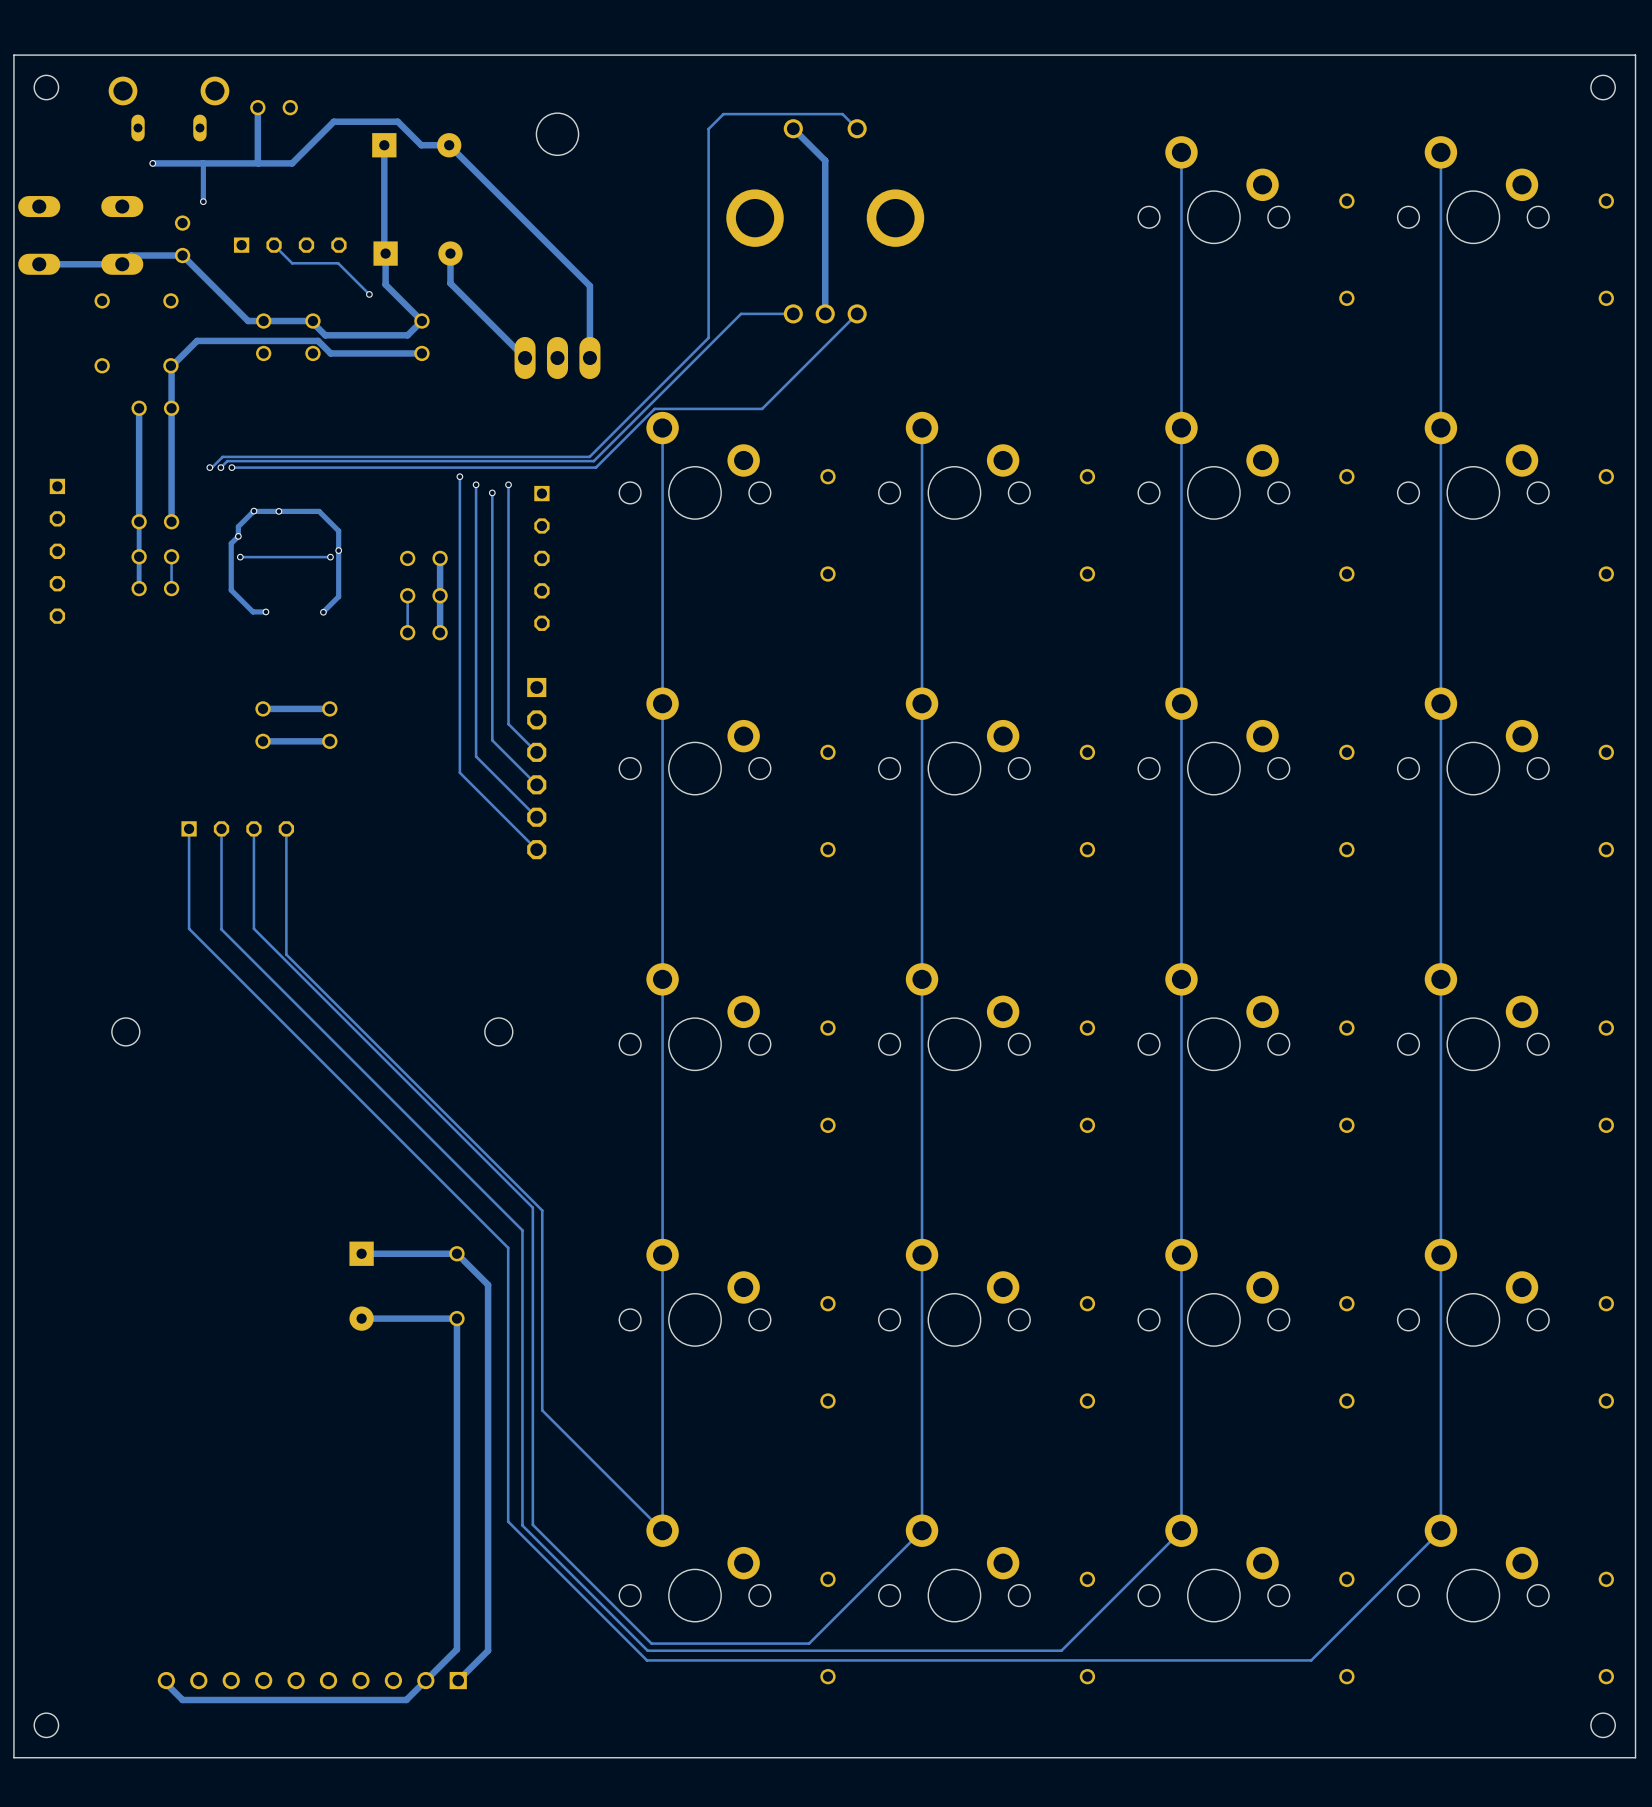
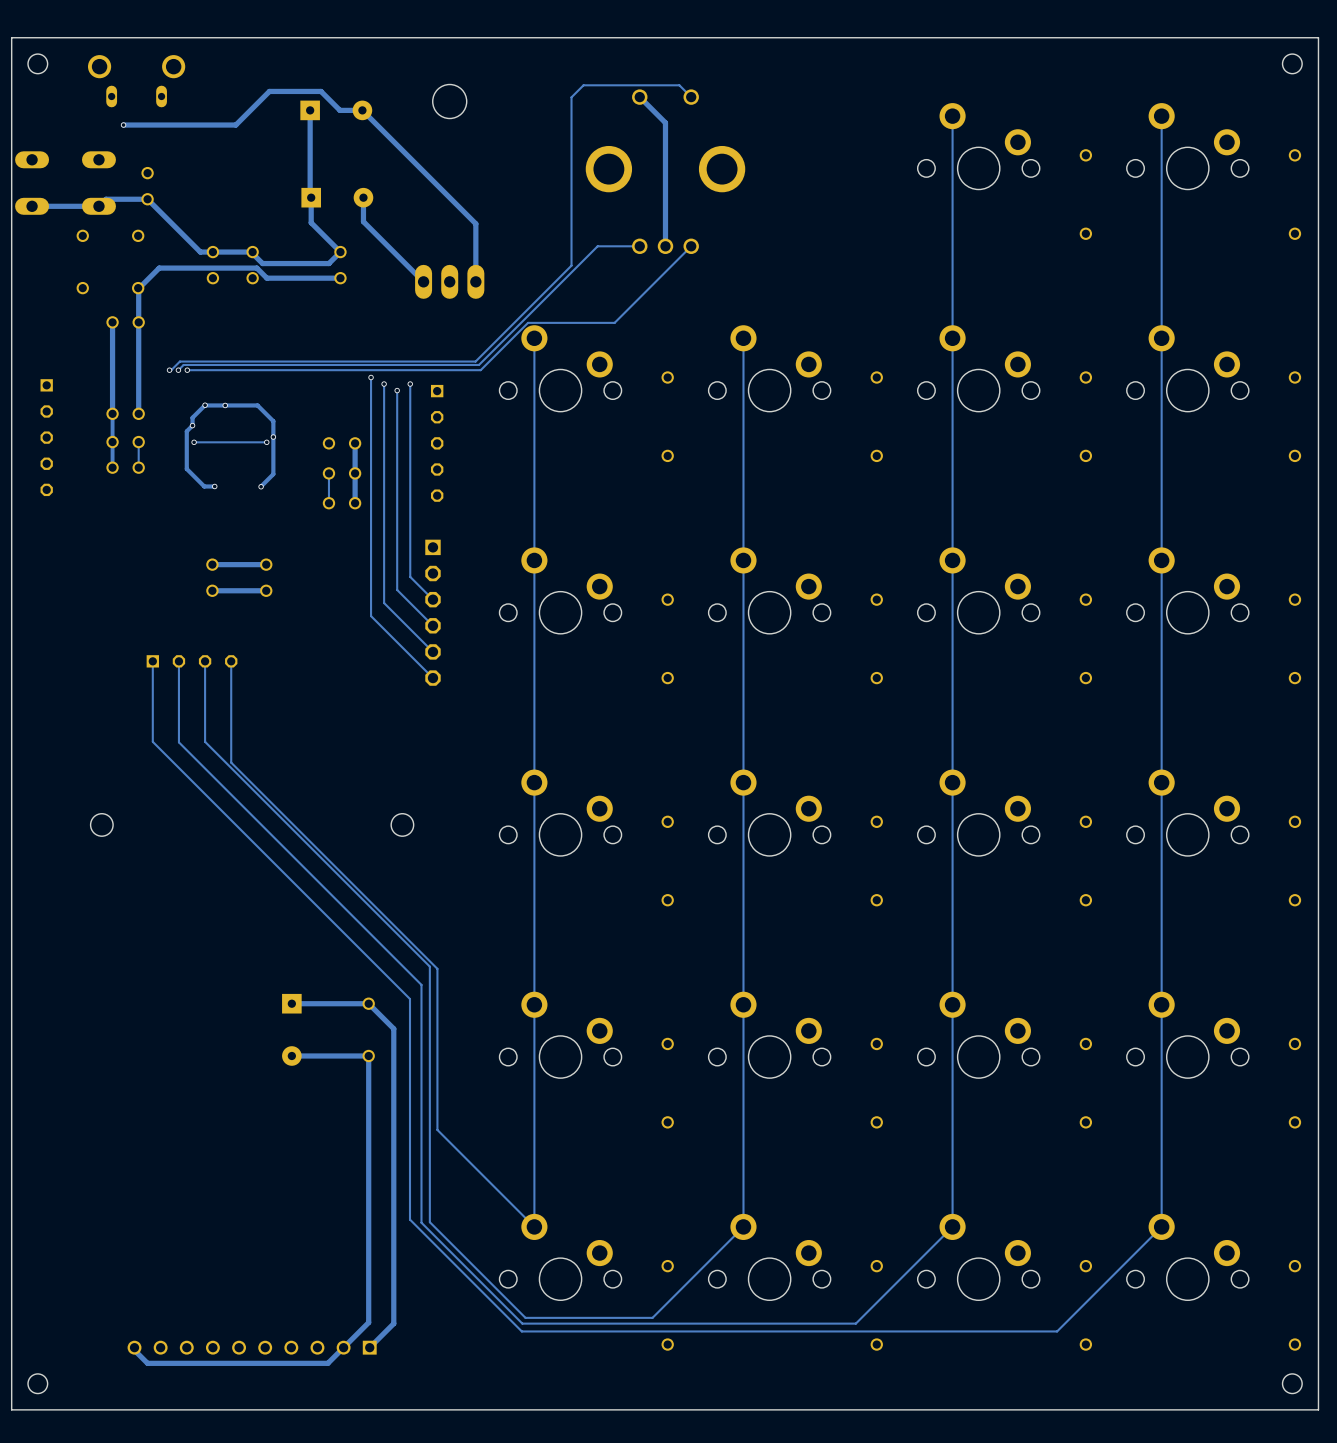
track: (257, 107) (258, 163) -> none
part: (274, 107) -> none
track: (202, 163) (203, 201) -> none
via: (203, 201) -> none
track: (274, 245) (292, 263) (338, 263) (369, 294) -> none
part: (290, 245) -> none
via: (369, 294) -> none

